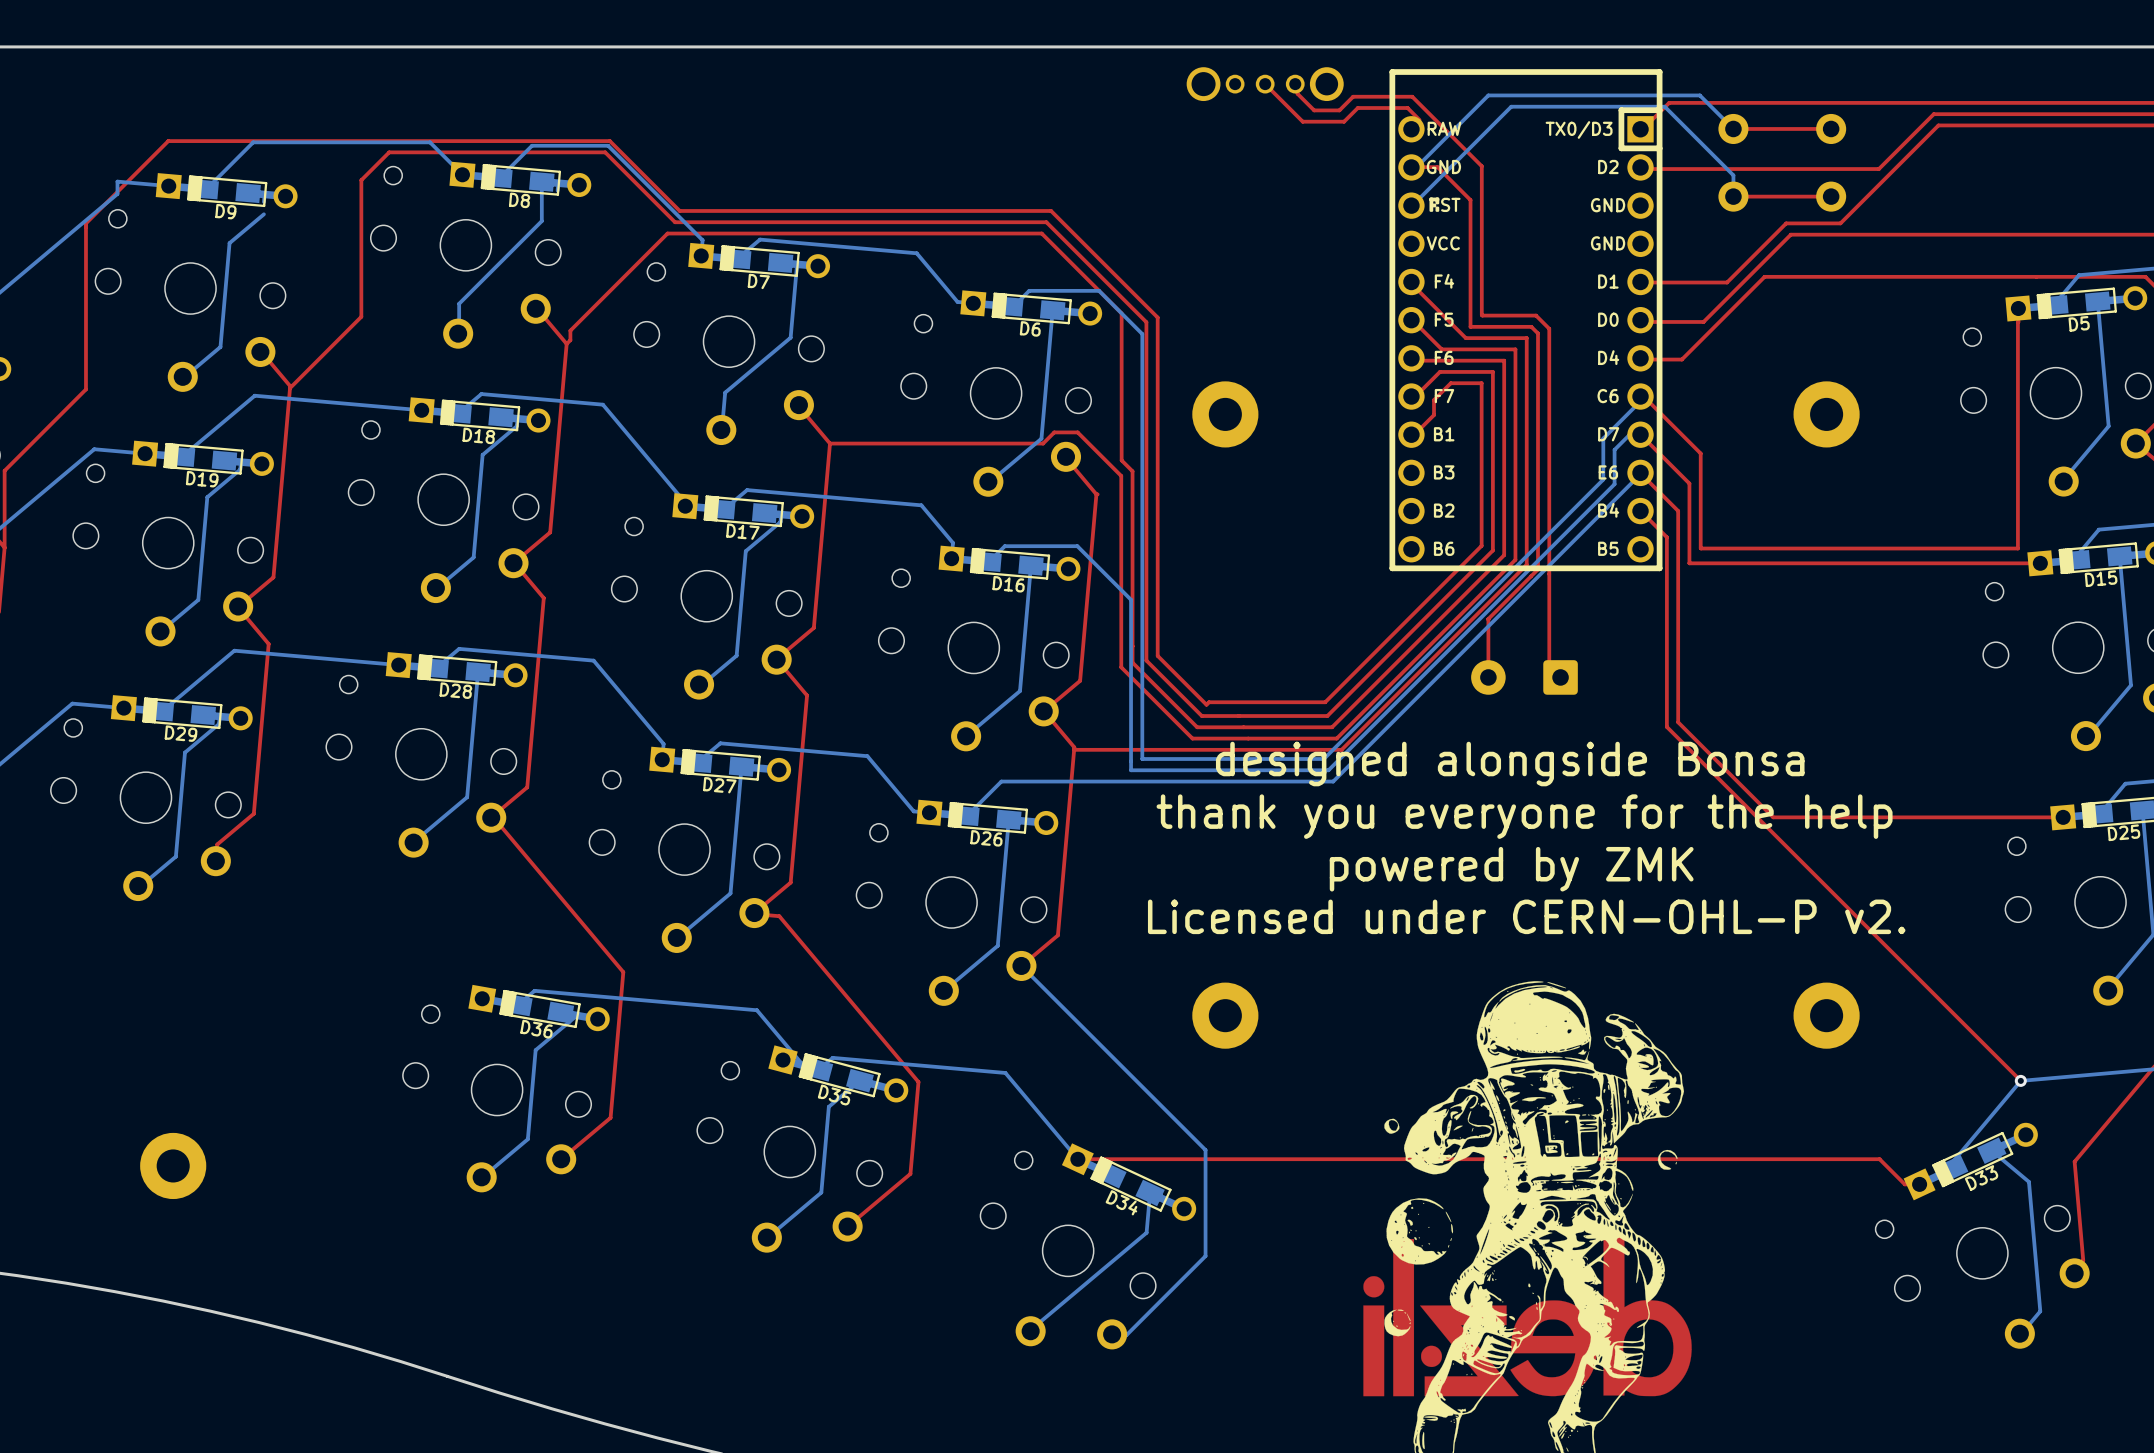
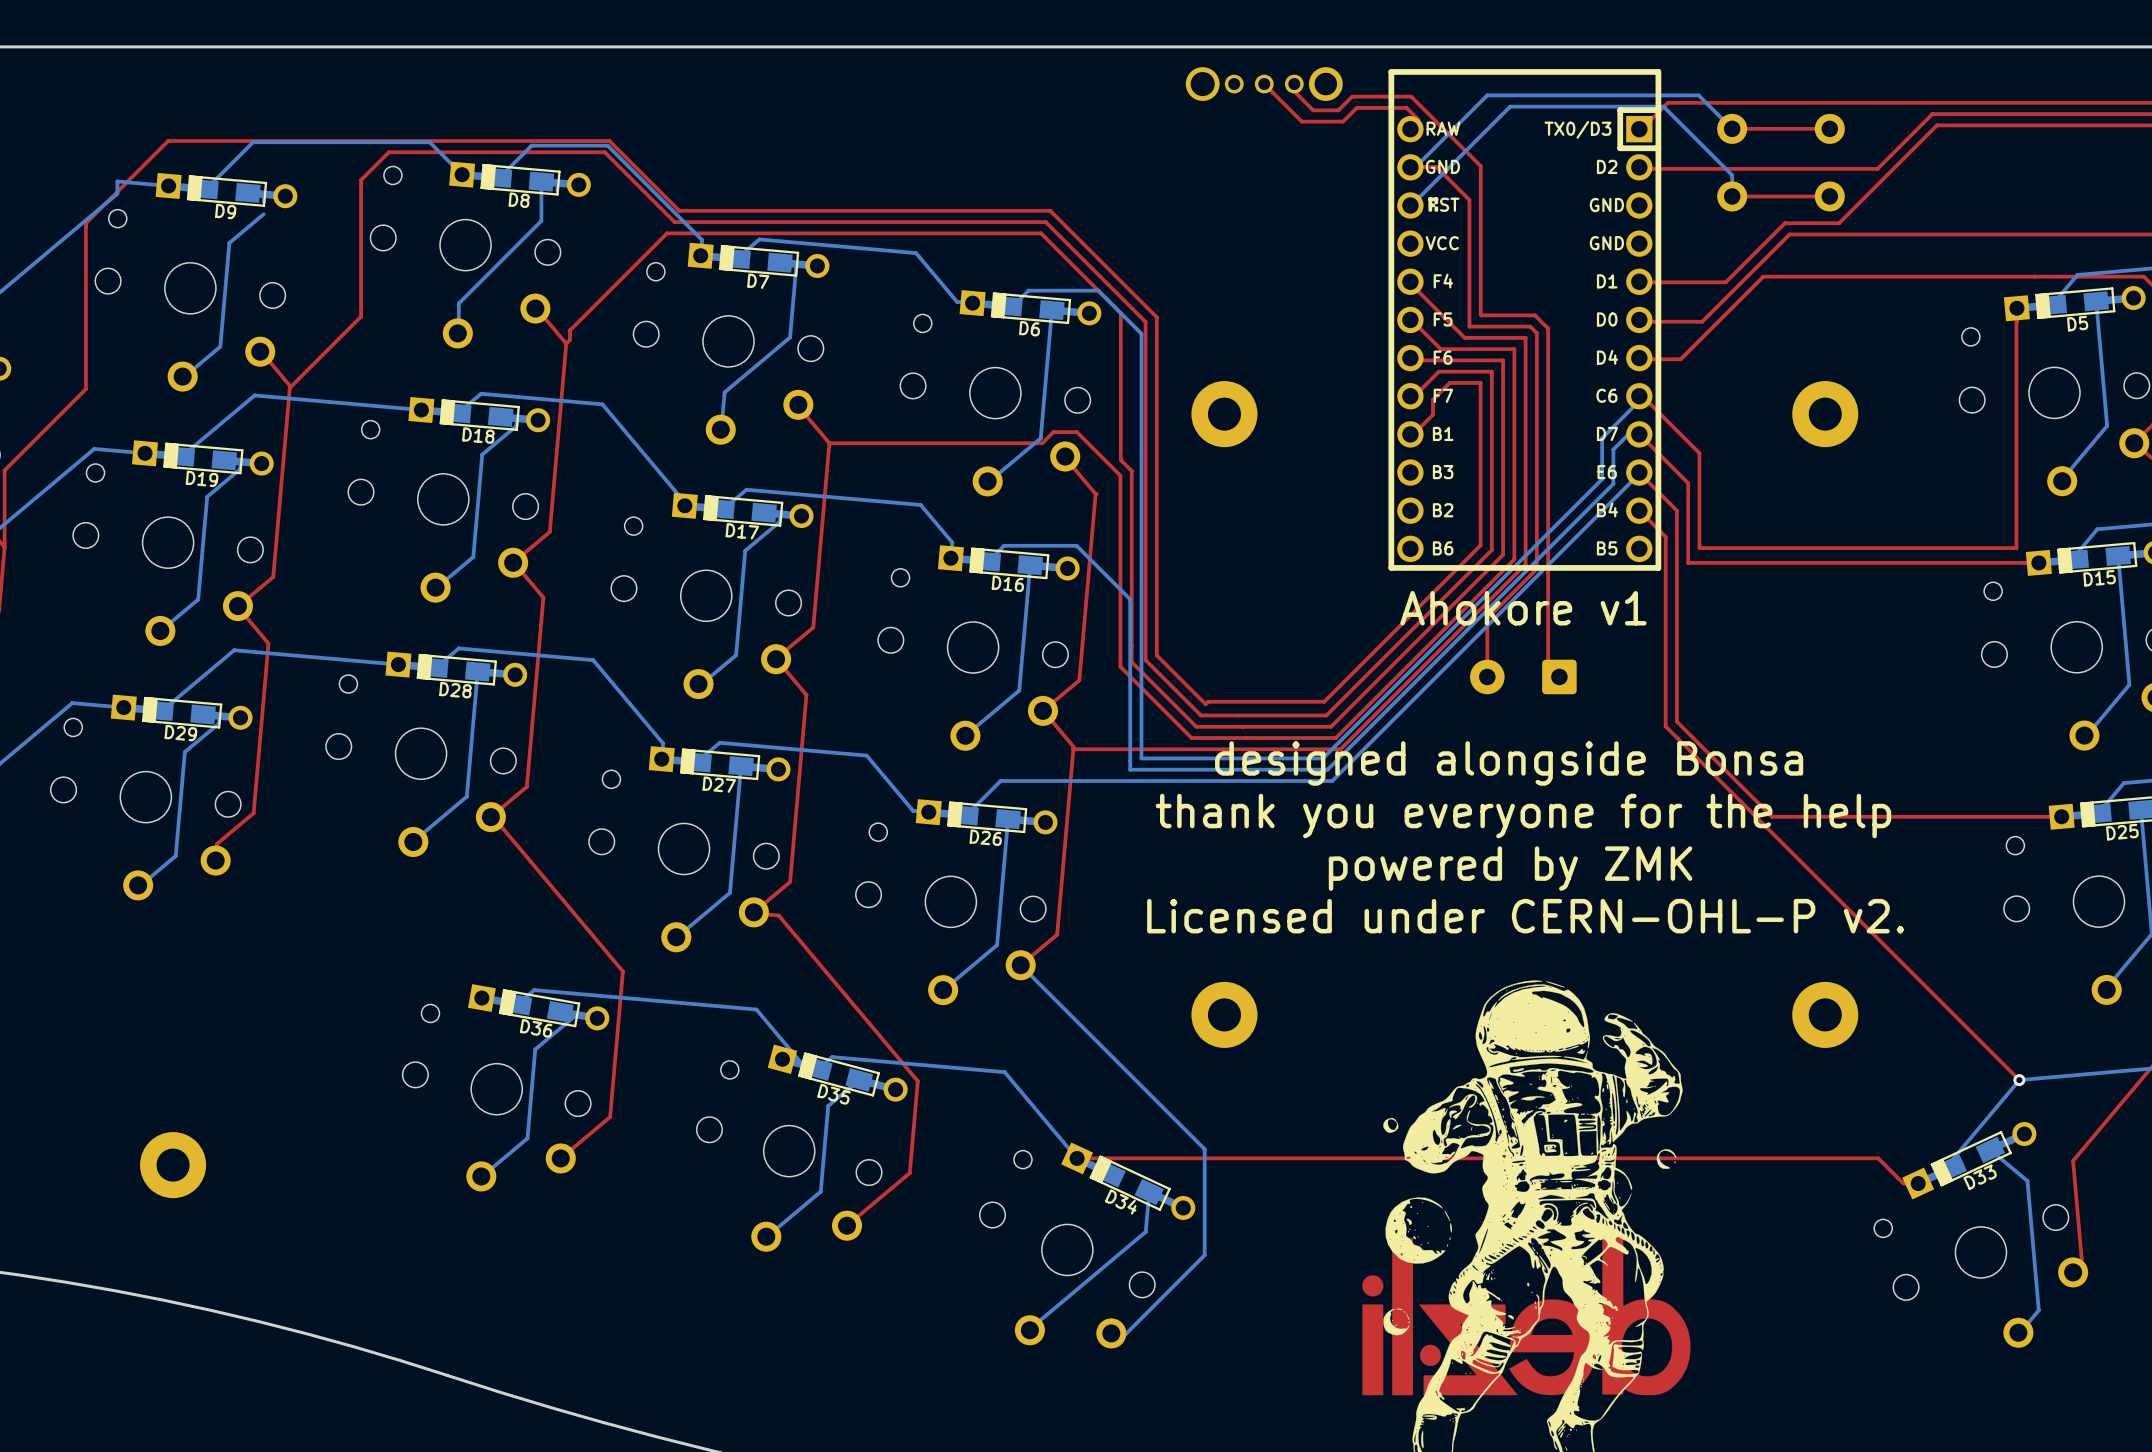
text: none -> Ahokore v1 (1523, 608)

